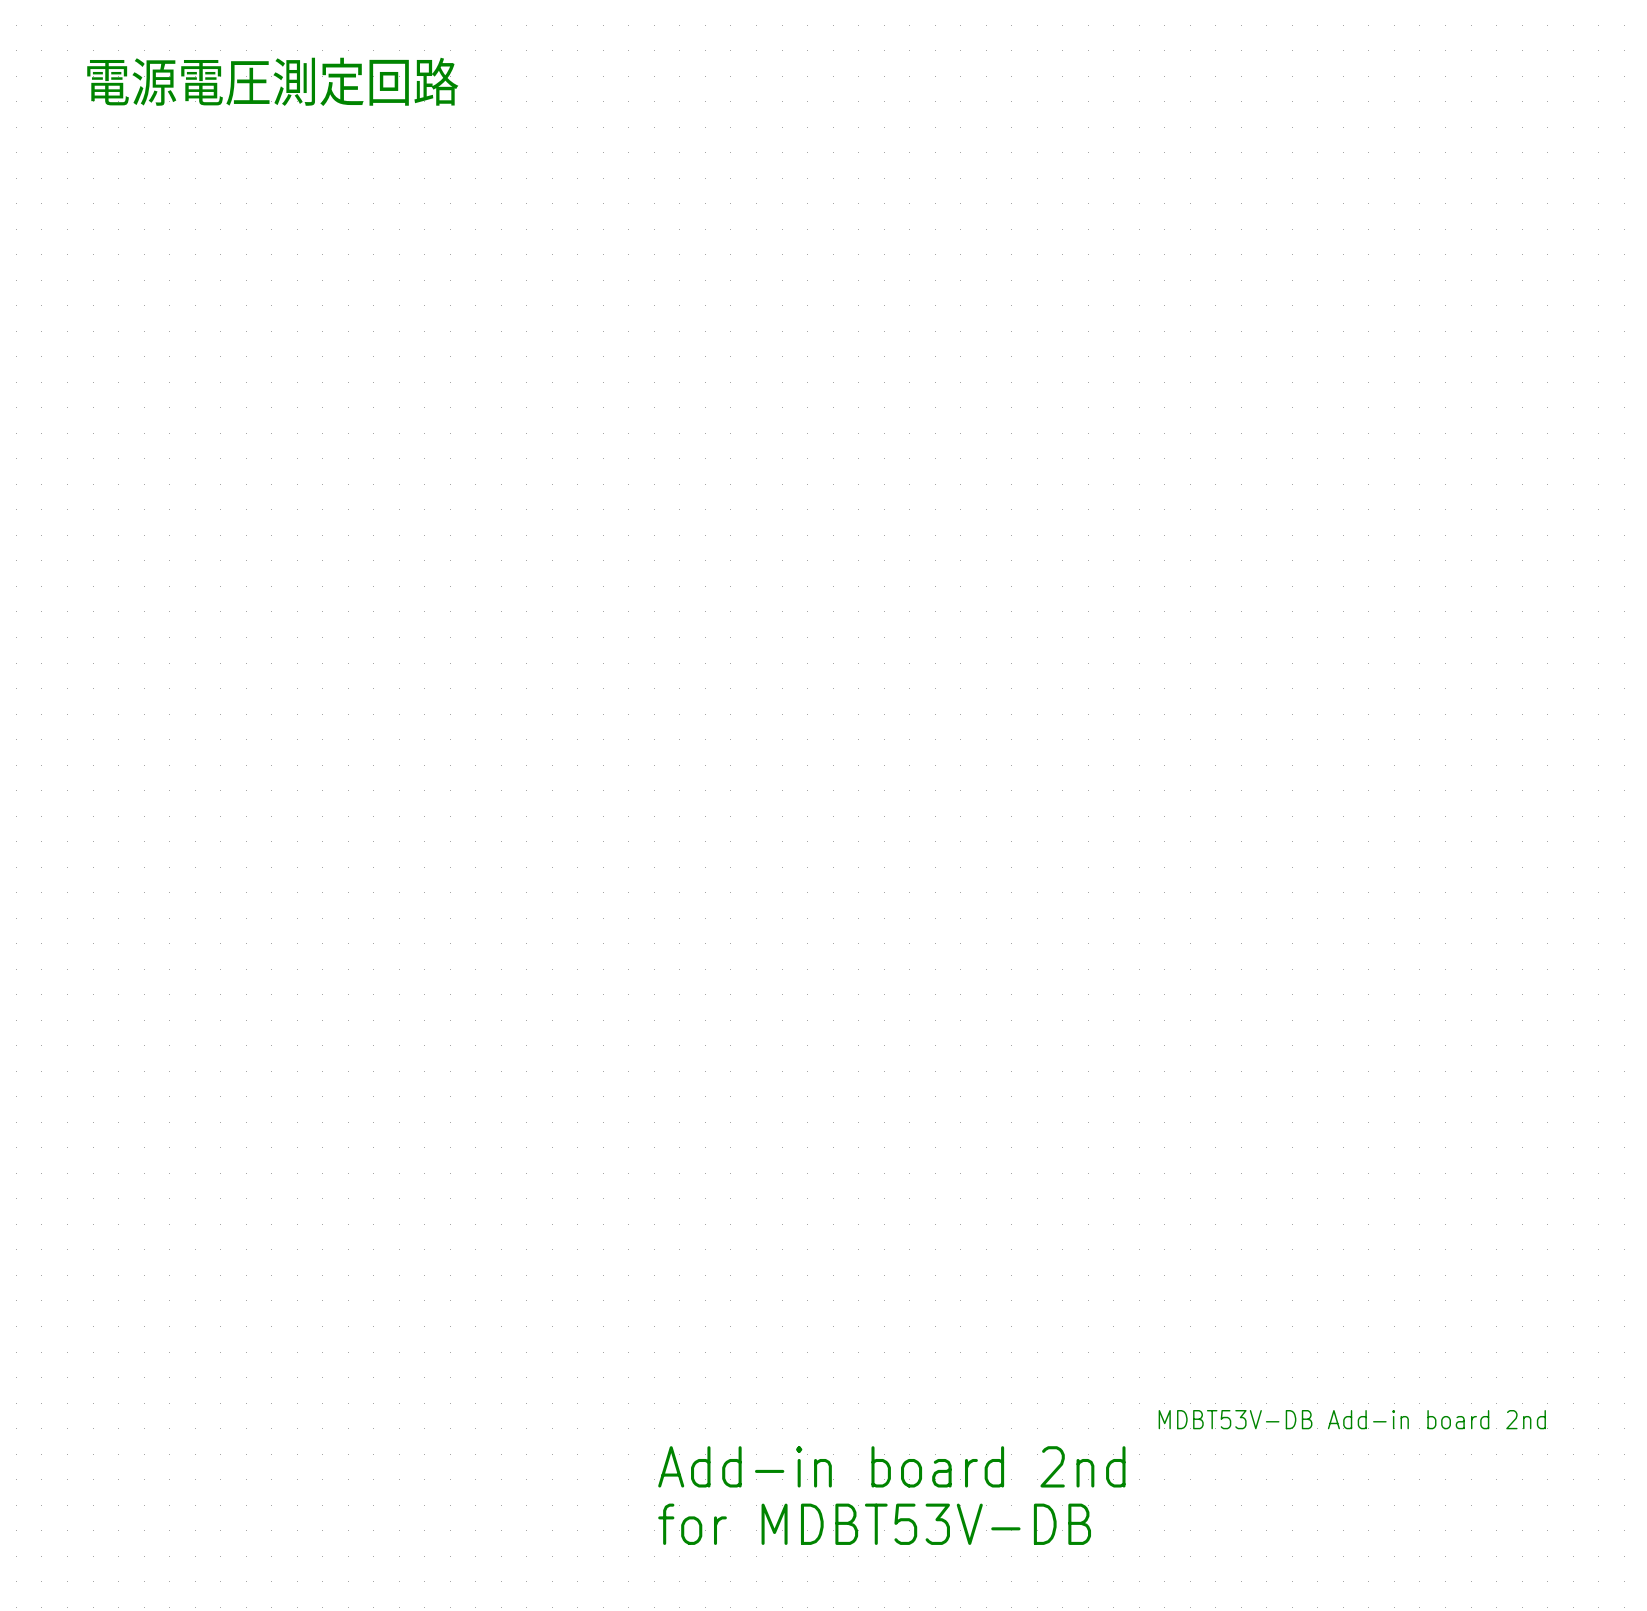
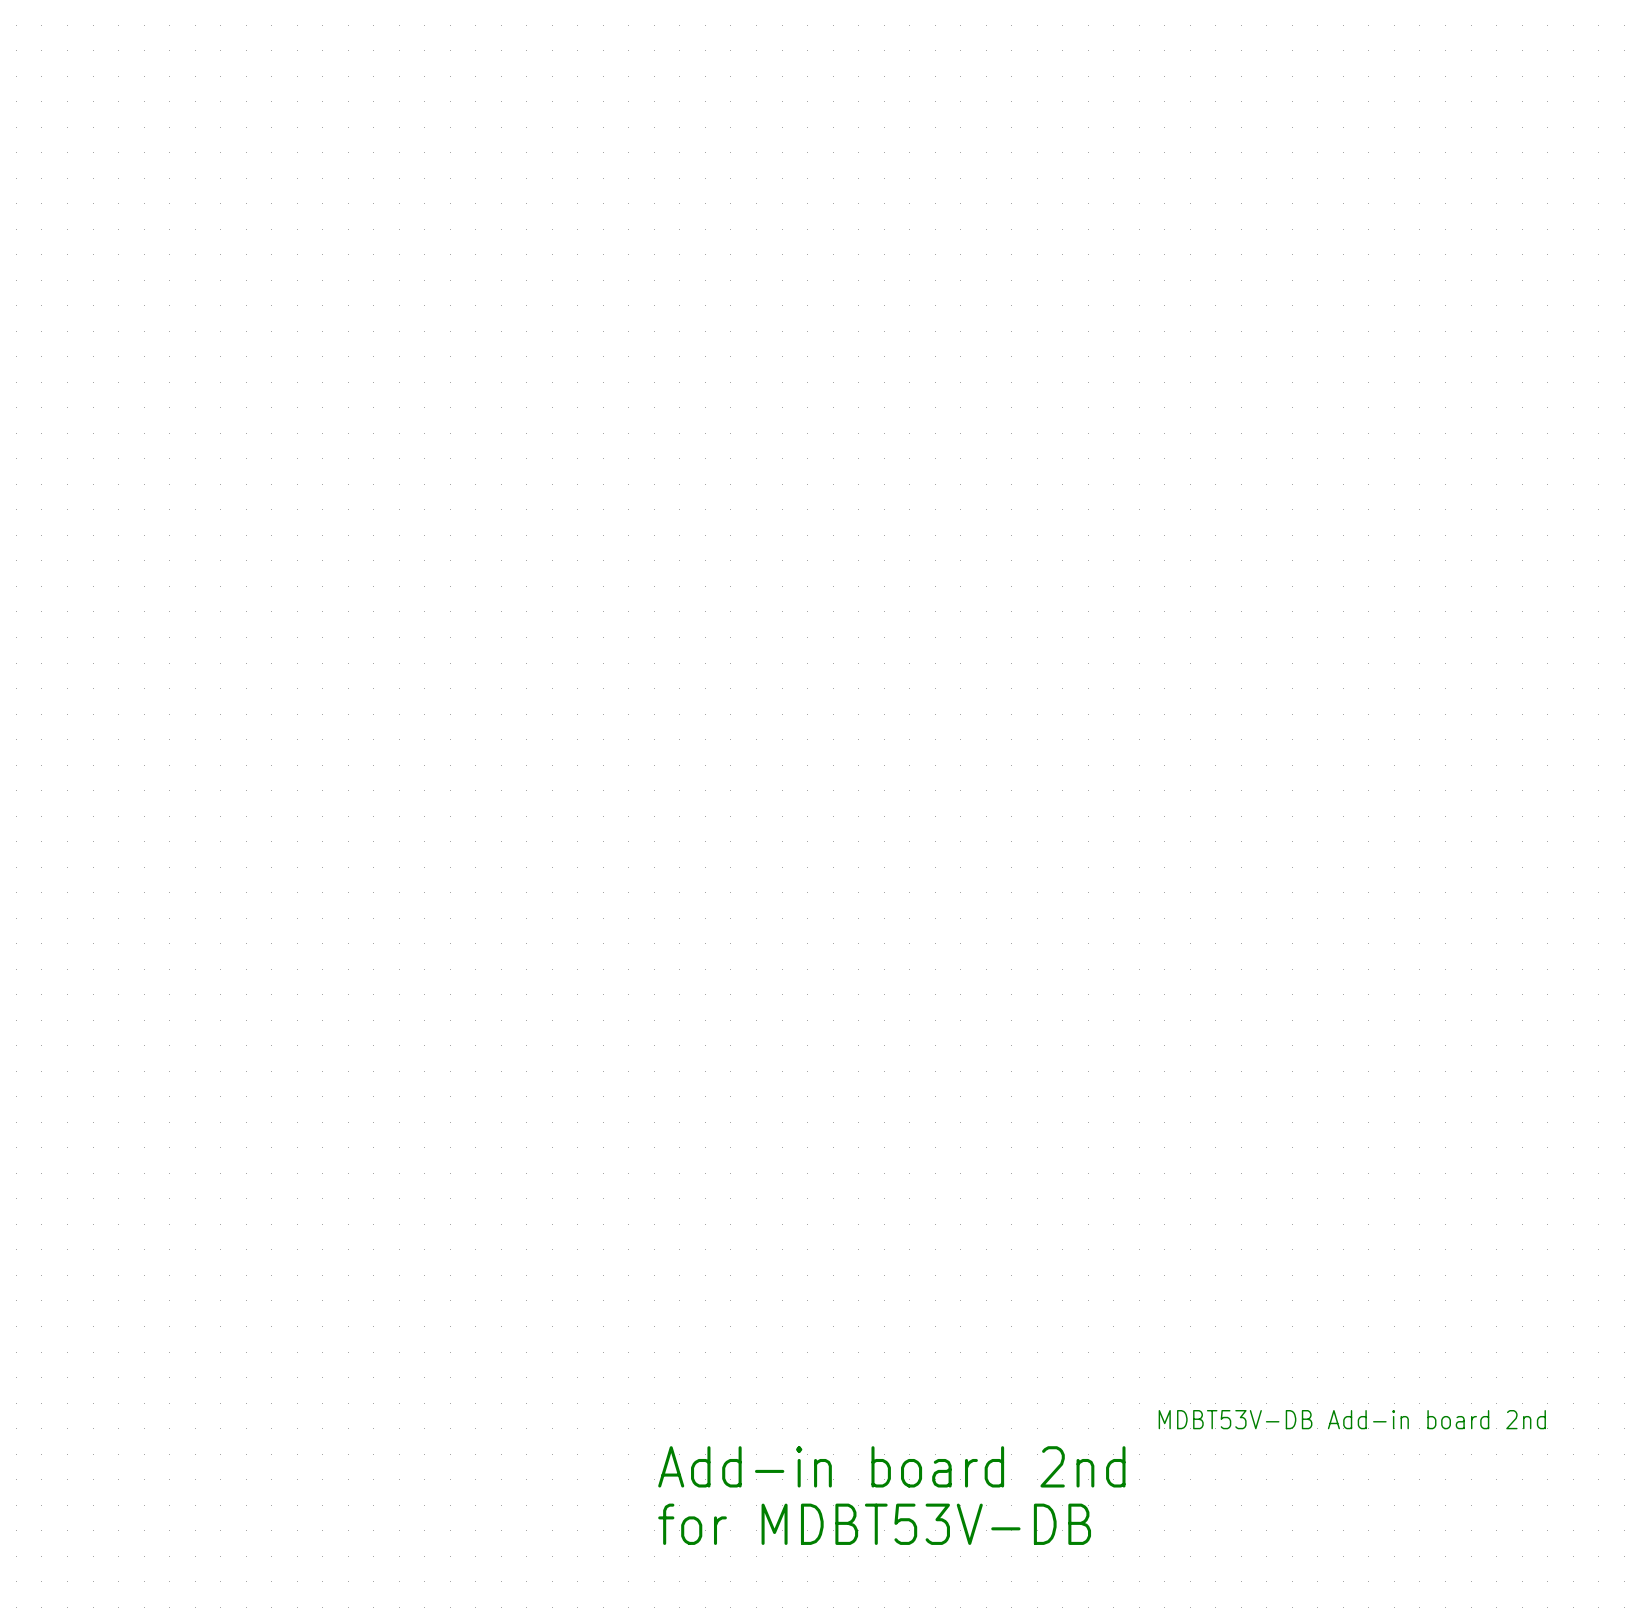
text: 電源電圧測定回路 (272, 81) -> none

